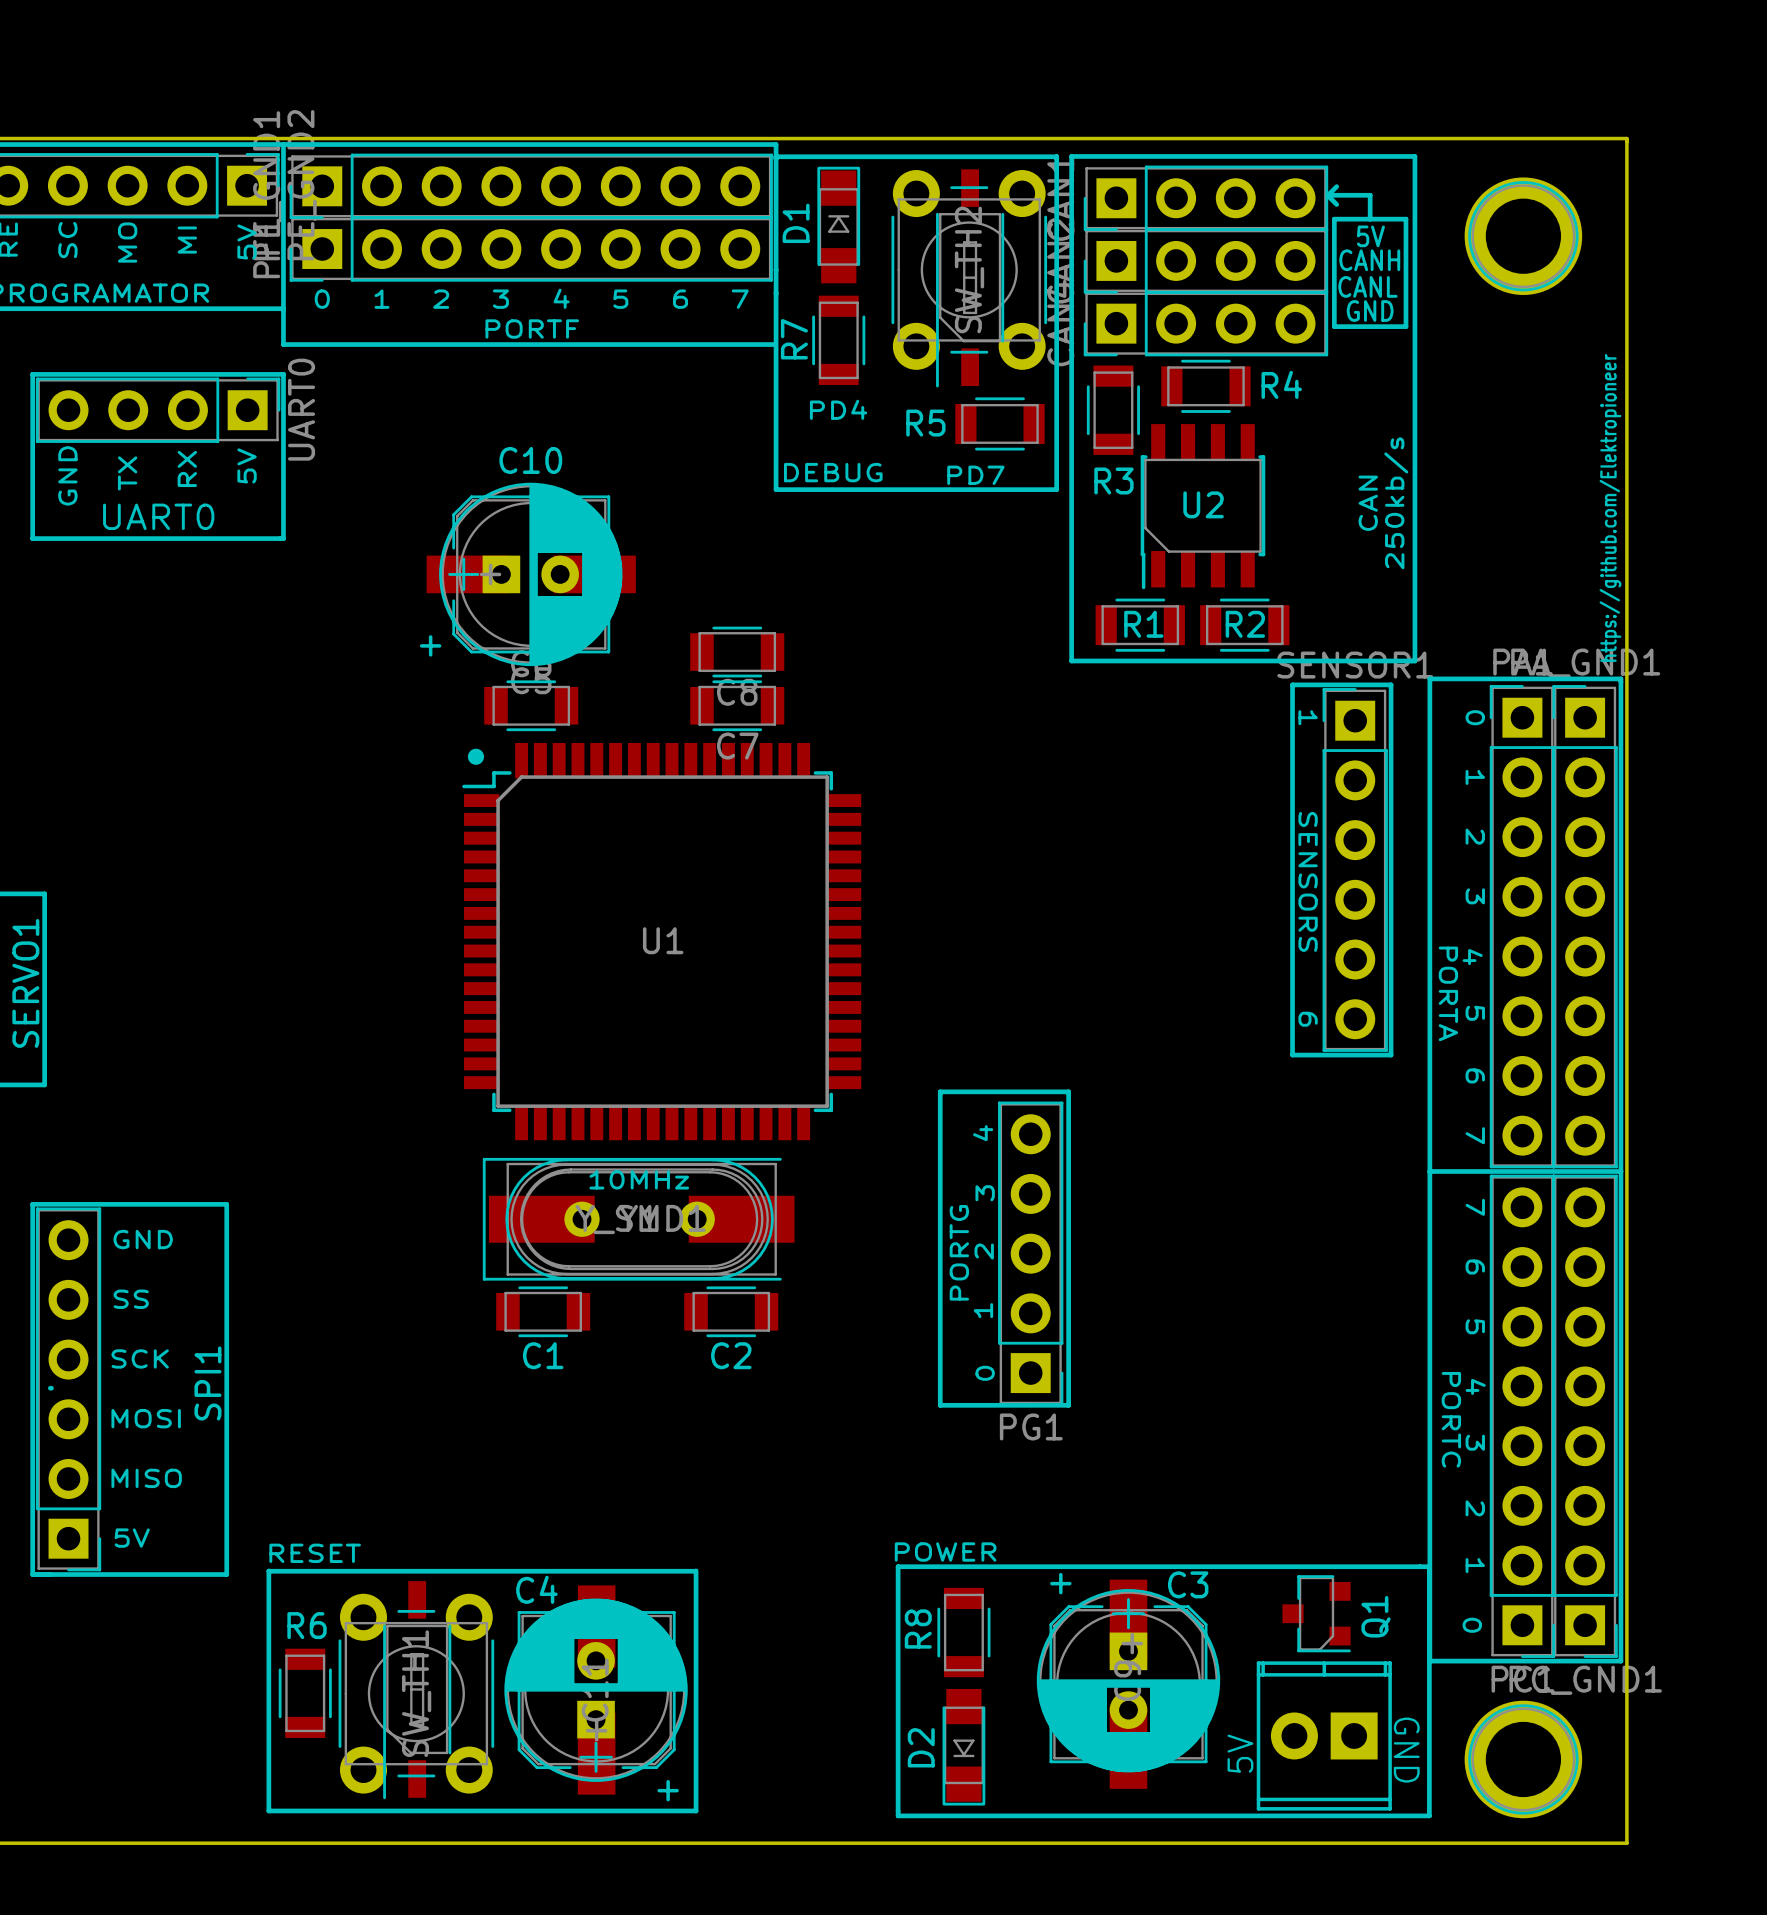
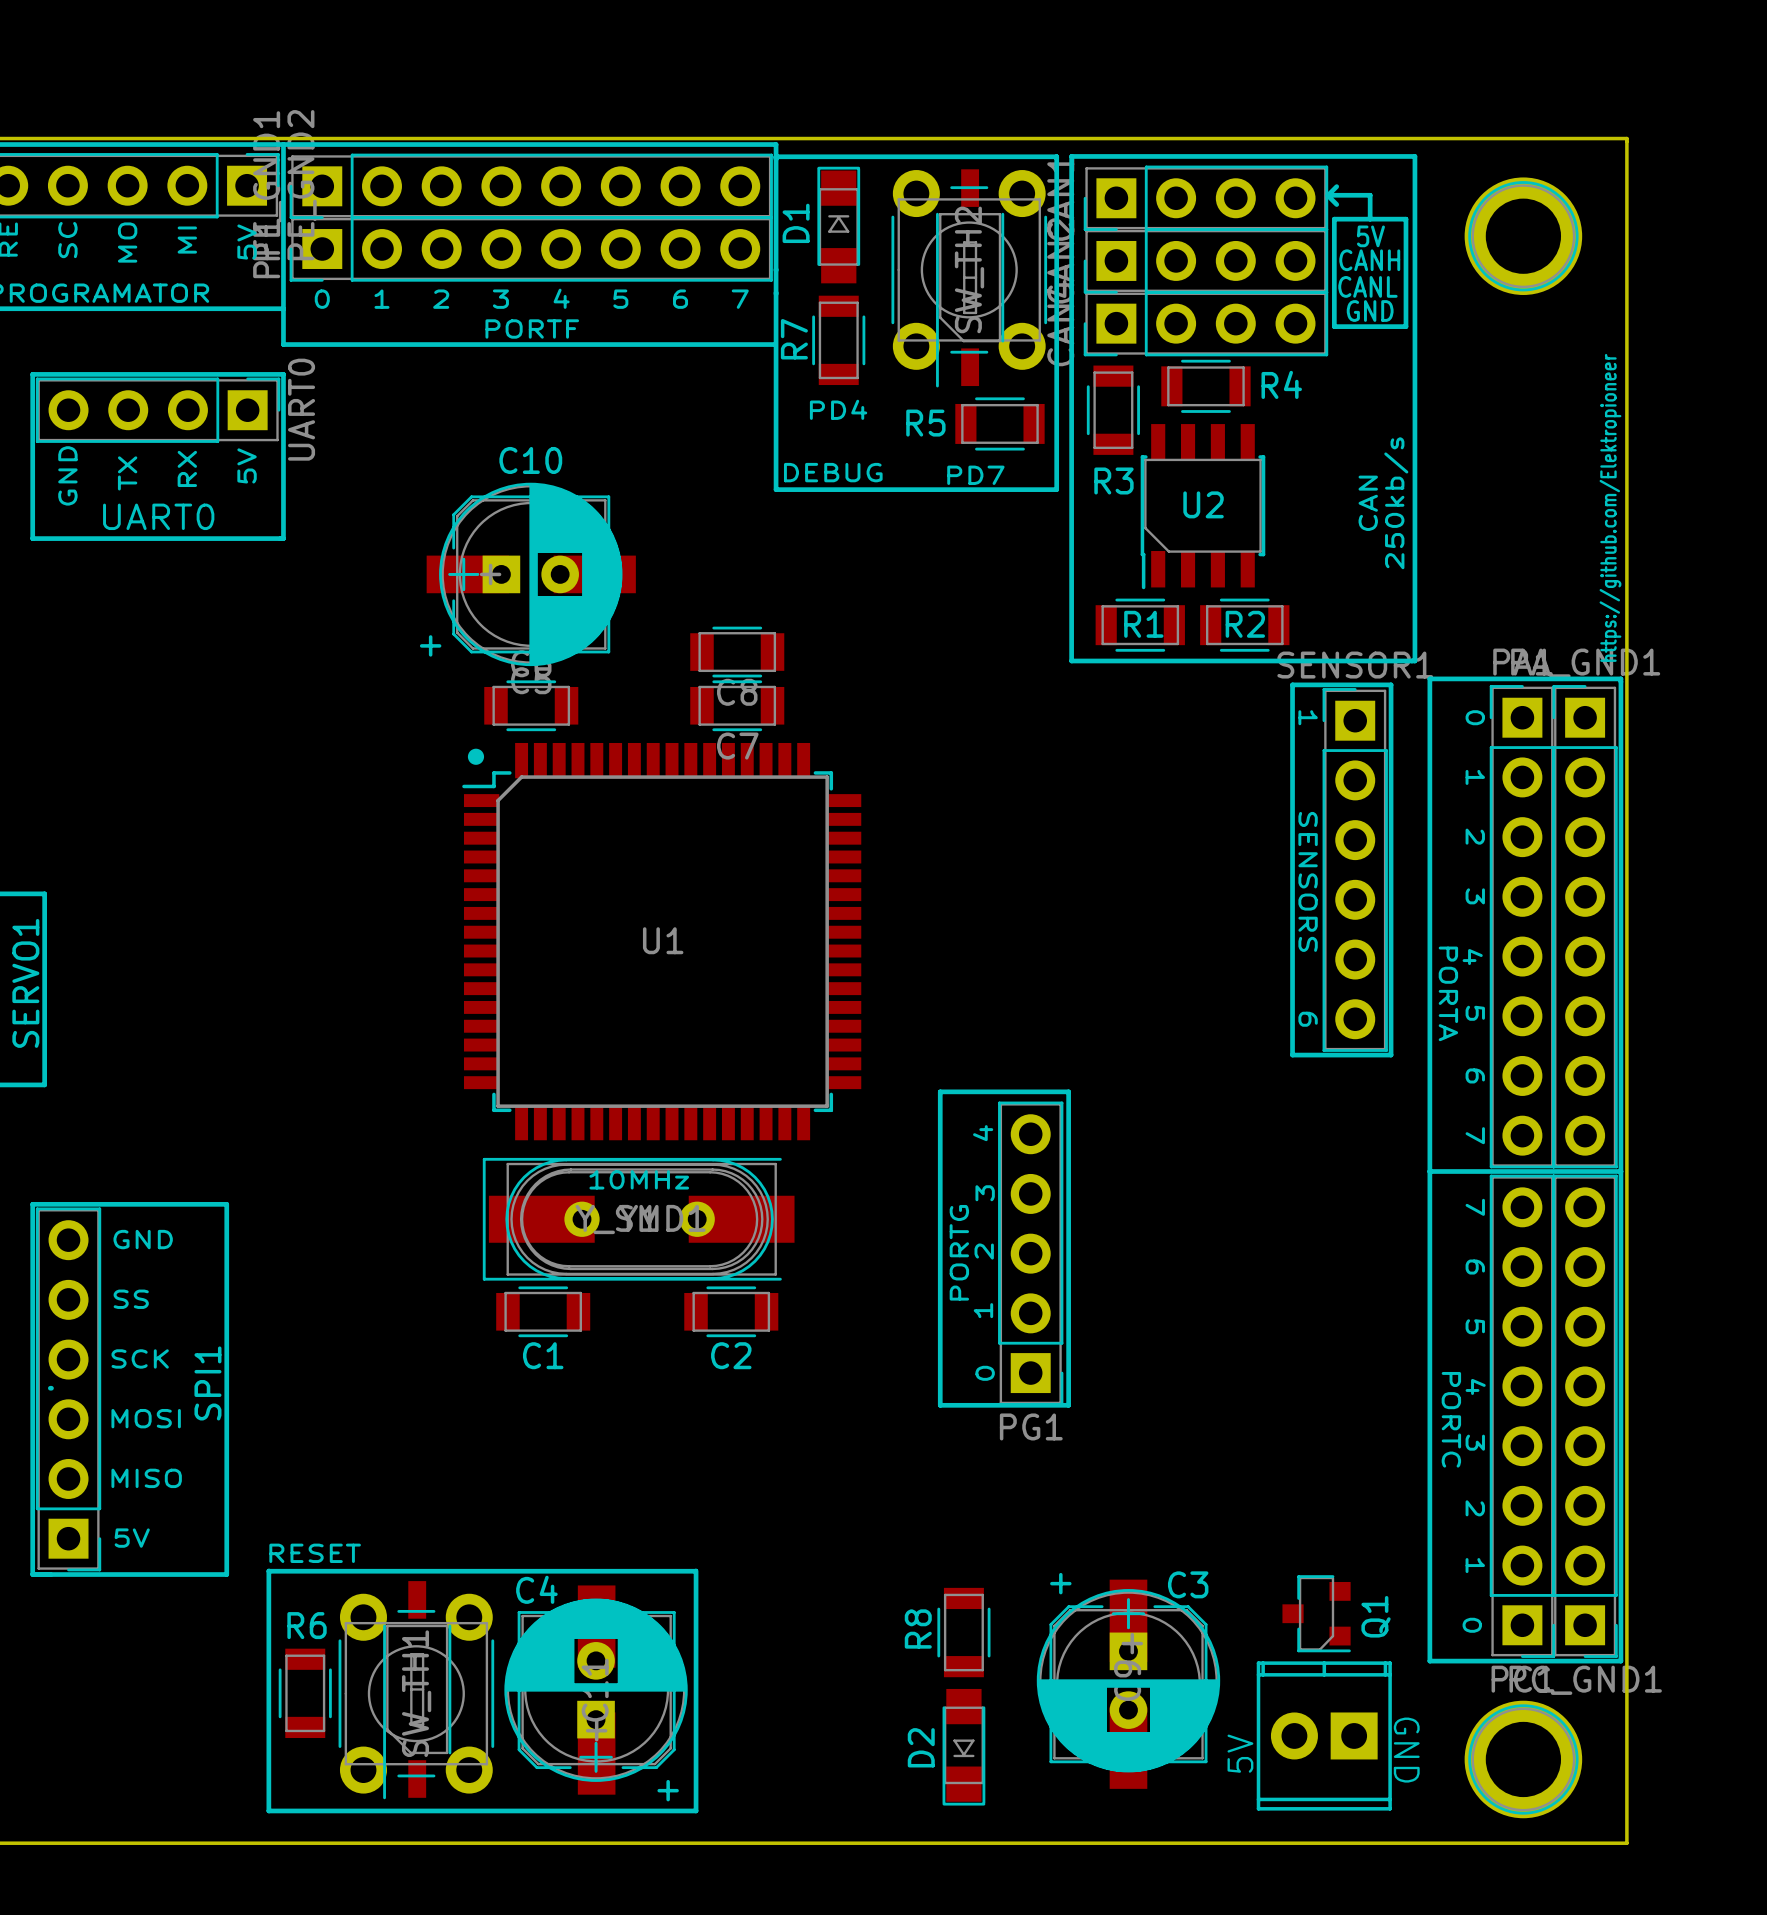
text: POWER (945, 1552) -> none
line: (898, 1566) (898, 1815) (1429, 1815) (1429, 1566) (898, 1566) -> none

